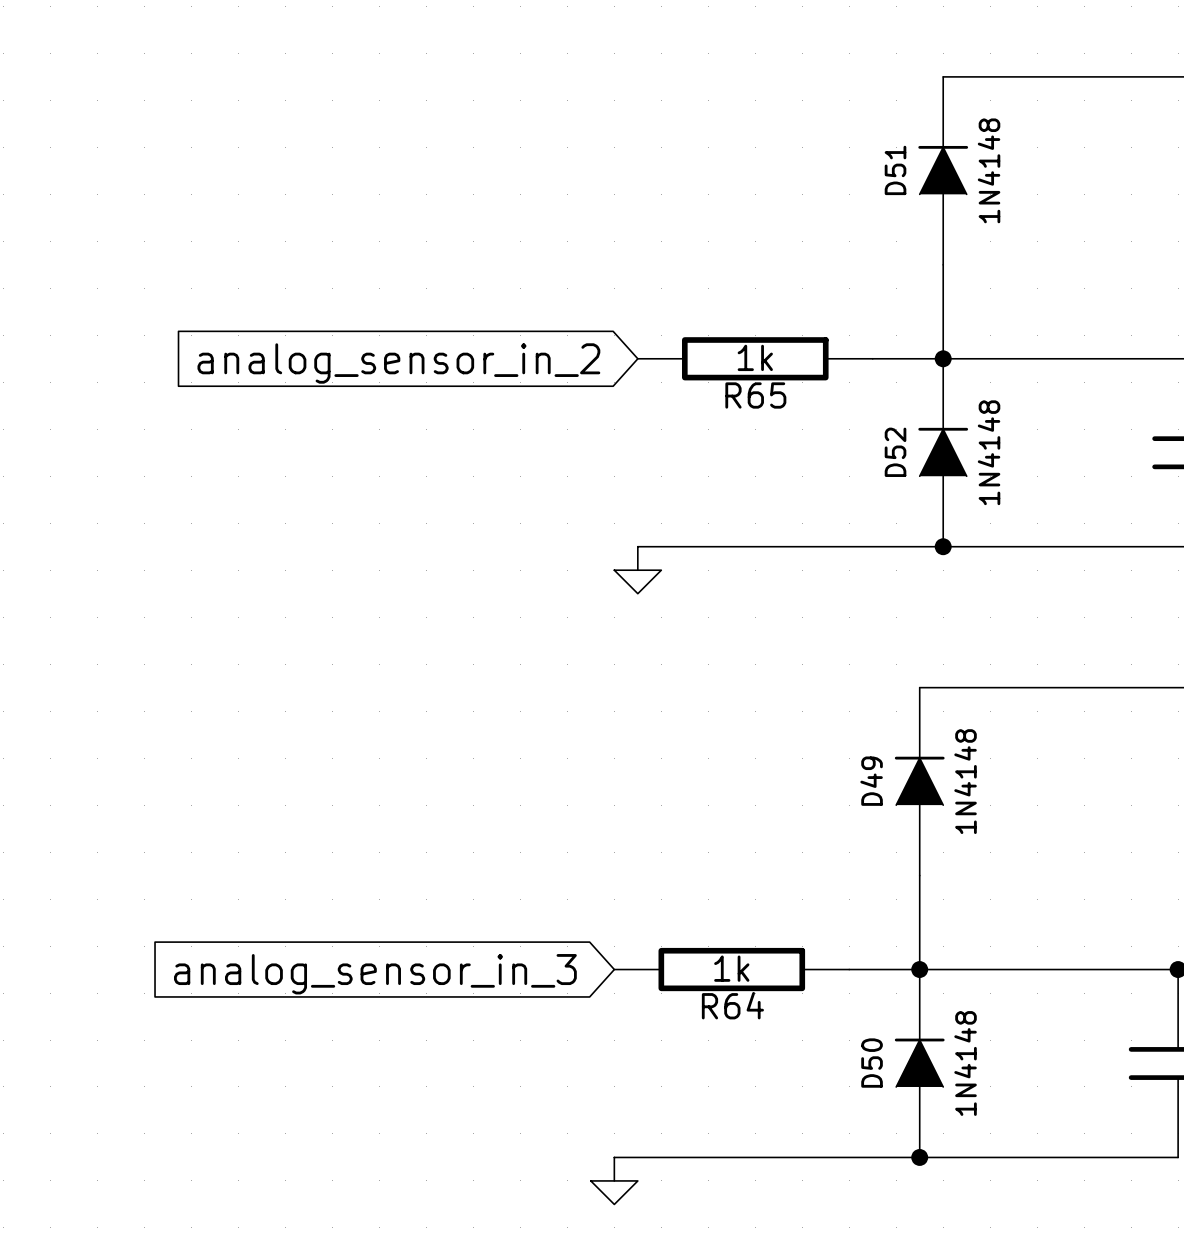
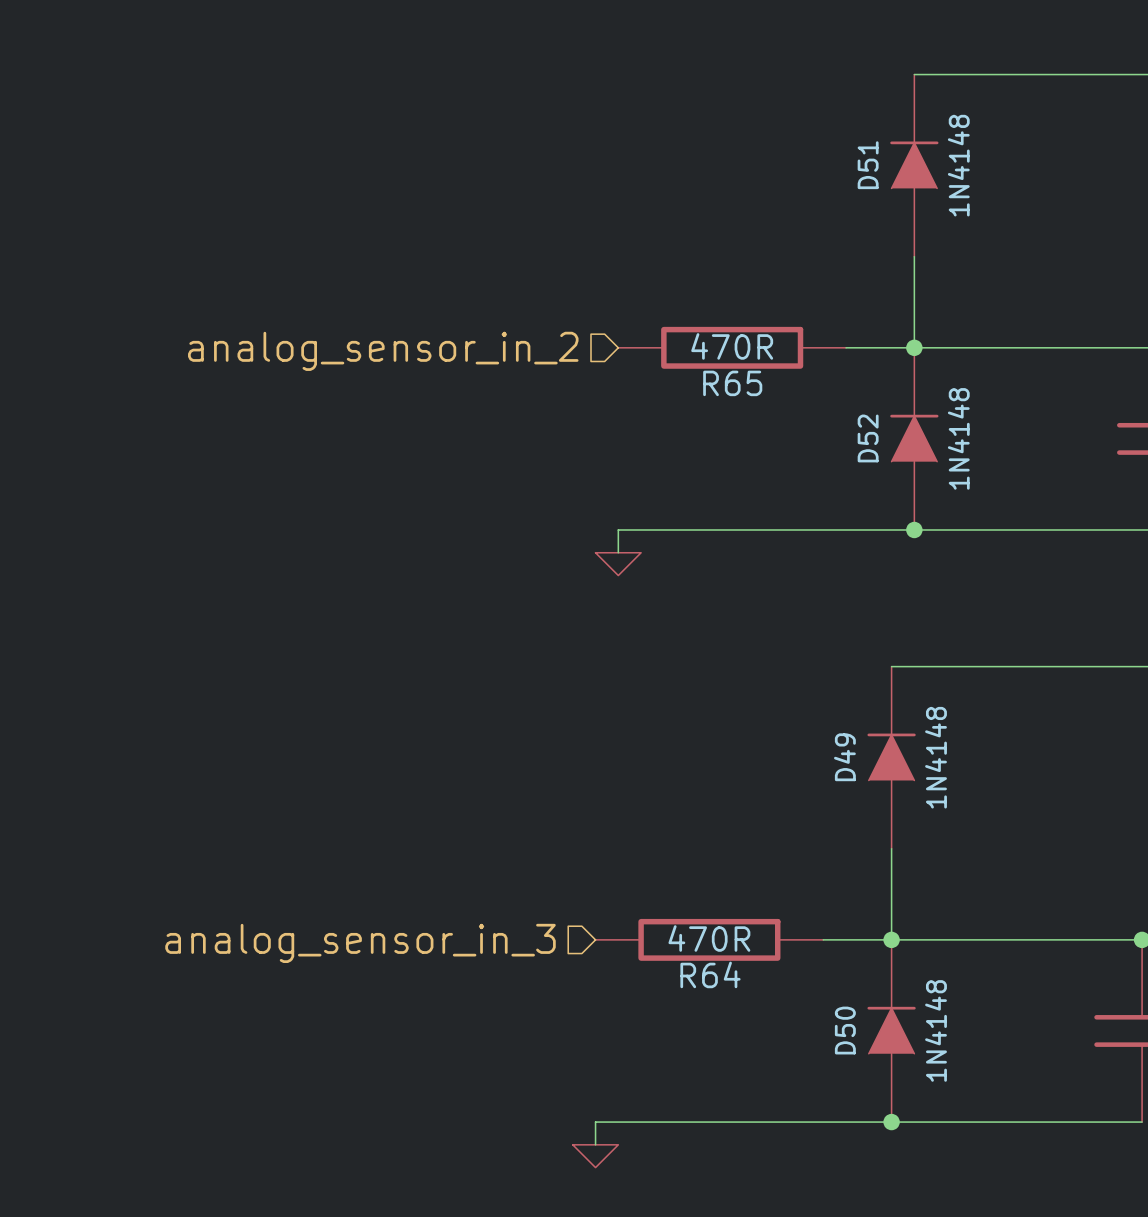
R65 value: 1k (755, 357) -> 470R (732, 346)
hierarchical label: none -> analog_sensor_in_2 (383, 351)
global label: analog_sensor_in_2 (398, 363) -> none
R64 value: 1k (731, 968) -> 470R (709, 938)
hierarchical label: none -> analog_sensor_in_3 (360, 943)
global label: analog_sensor_in_3 (375, 974) -> none

